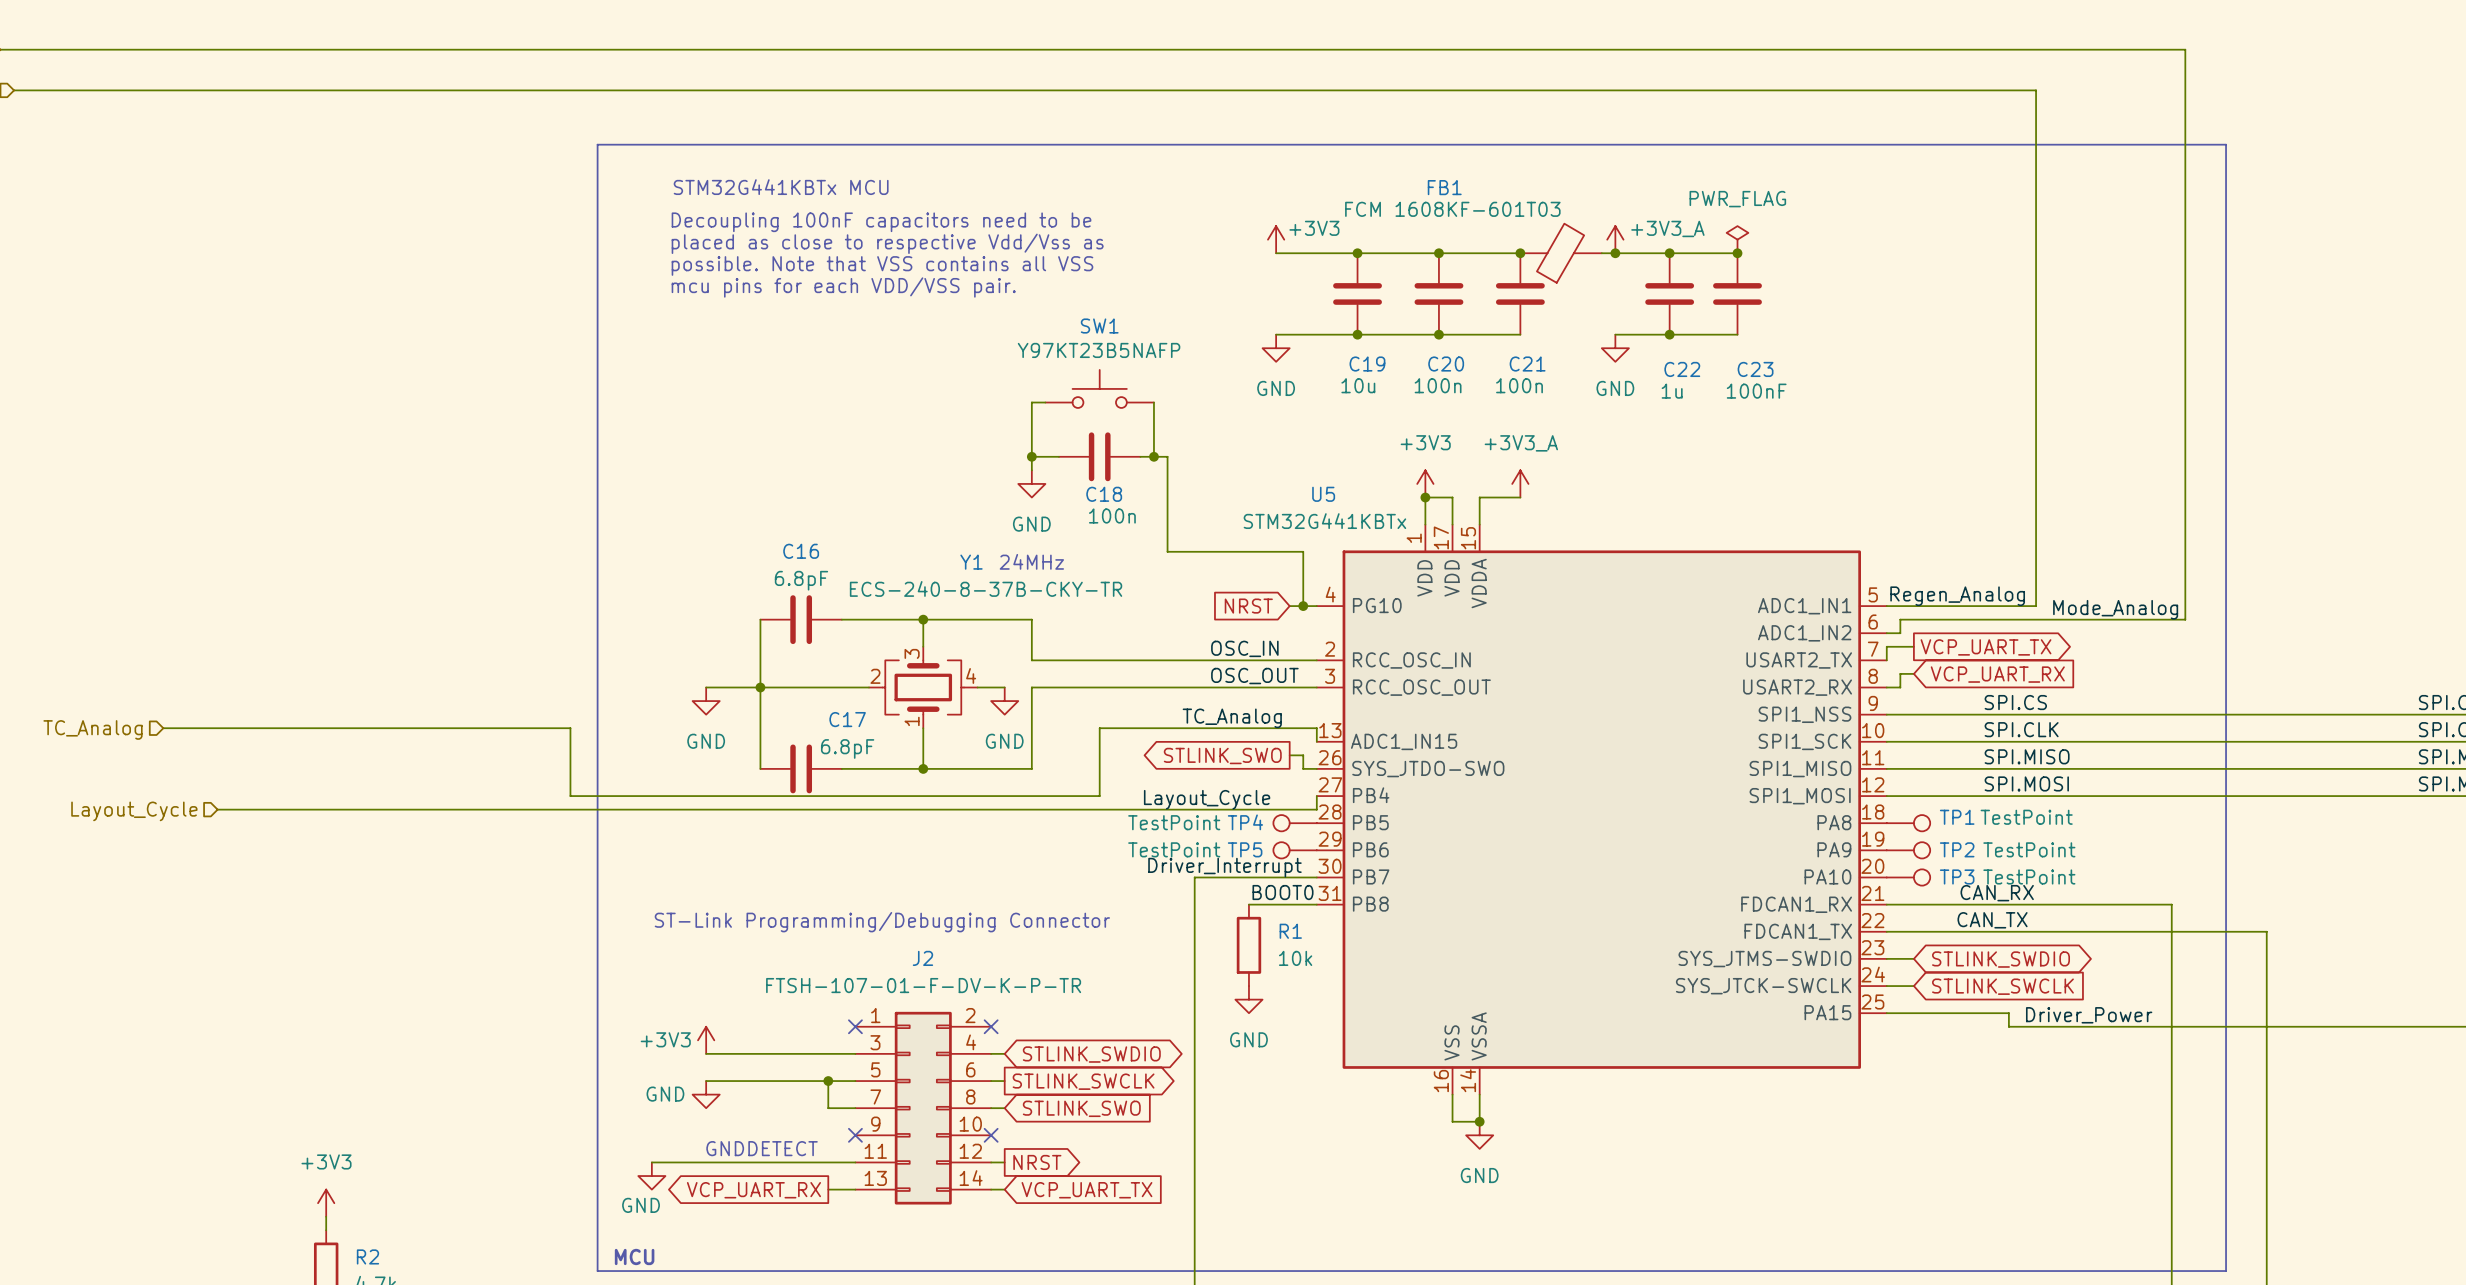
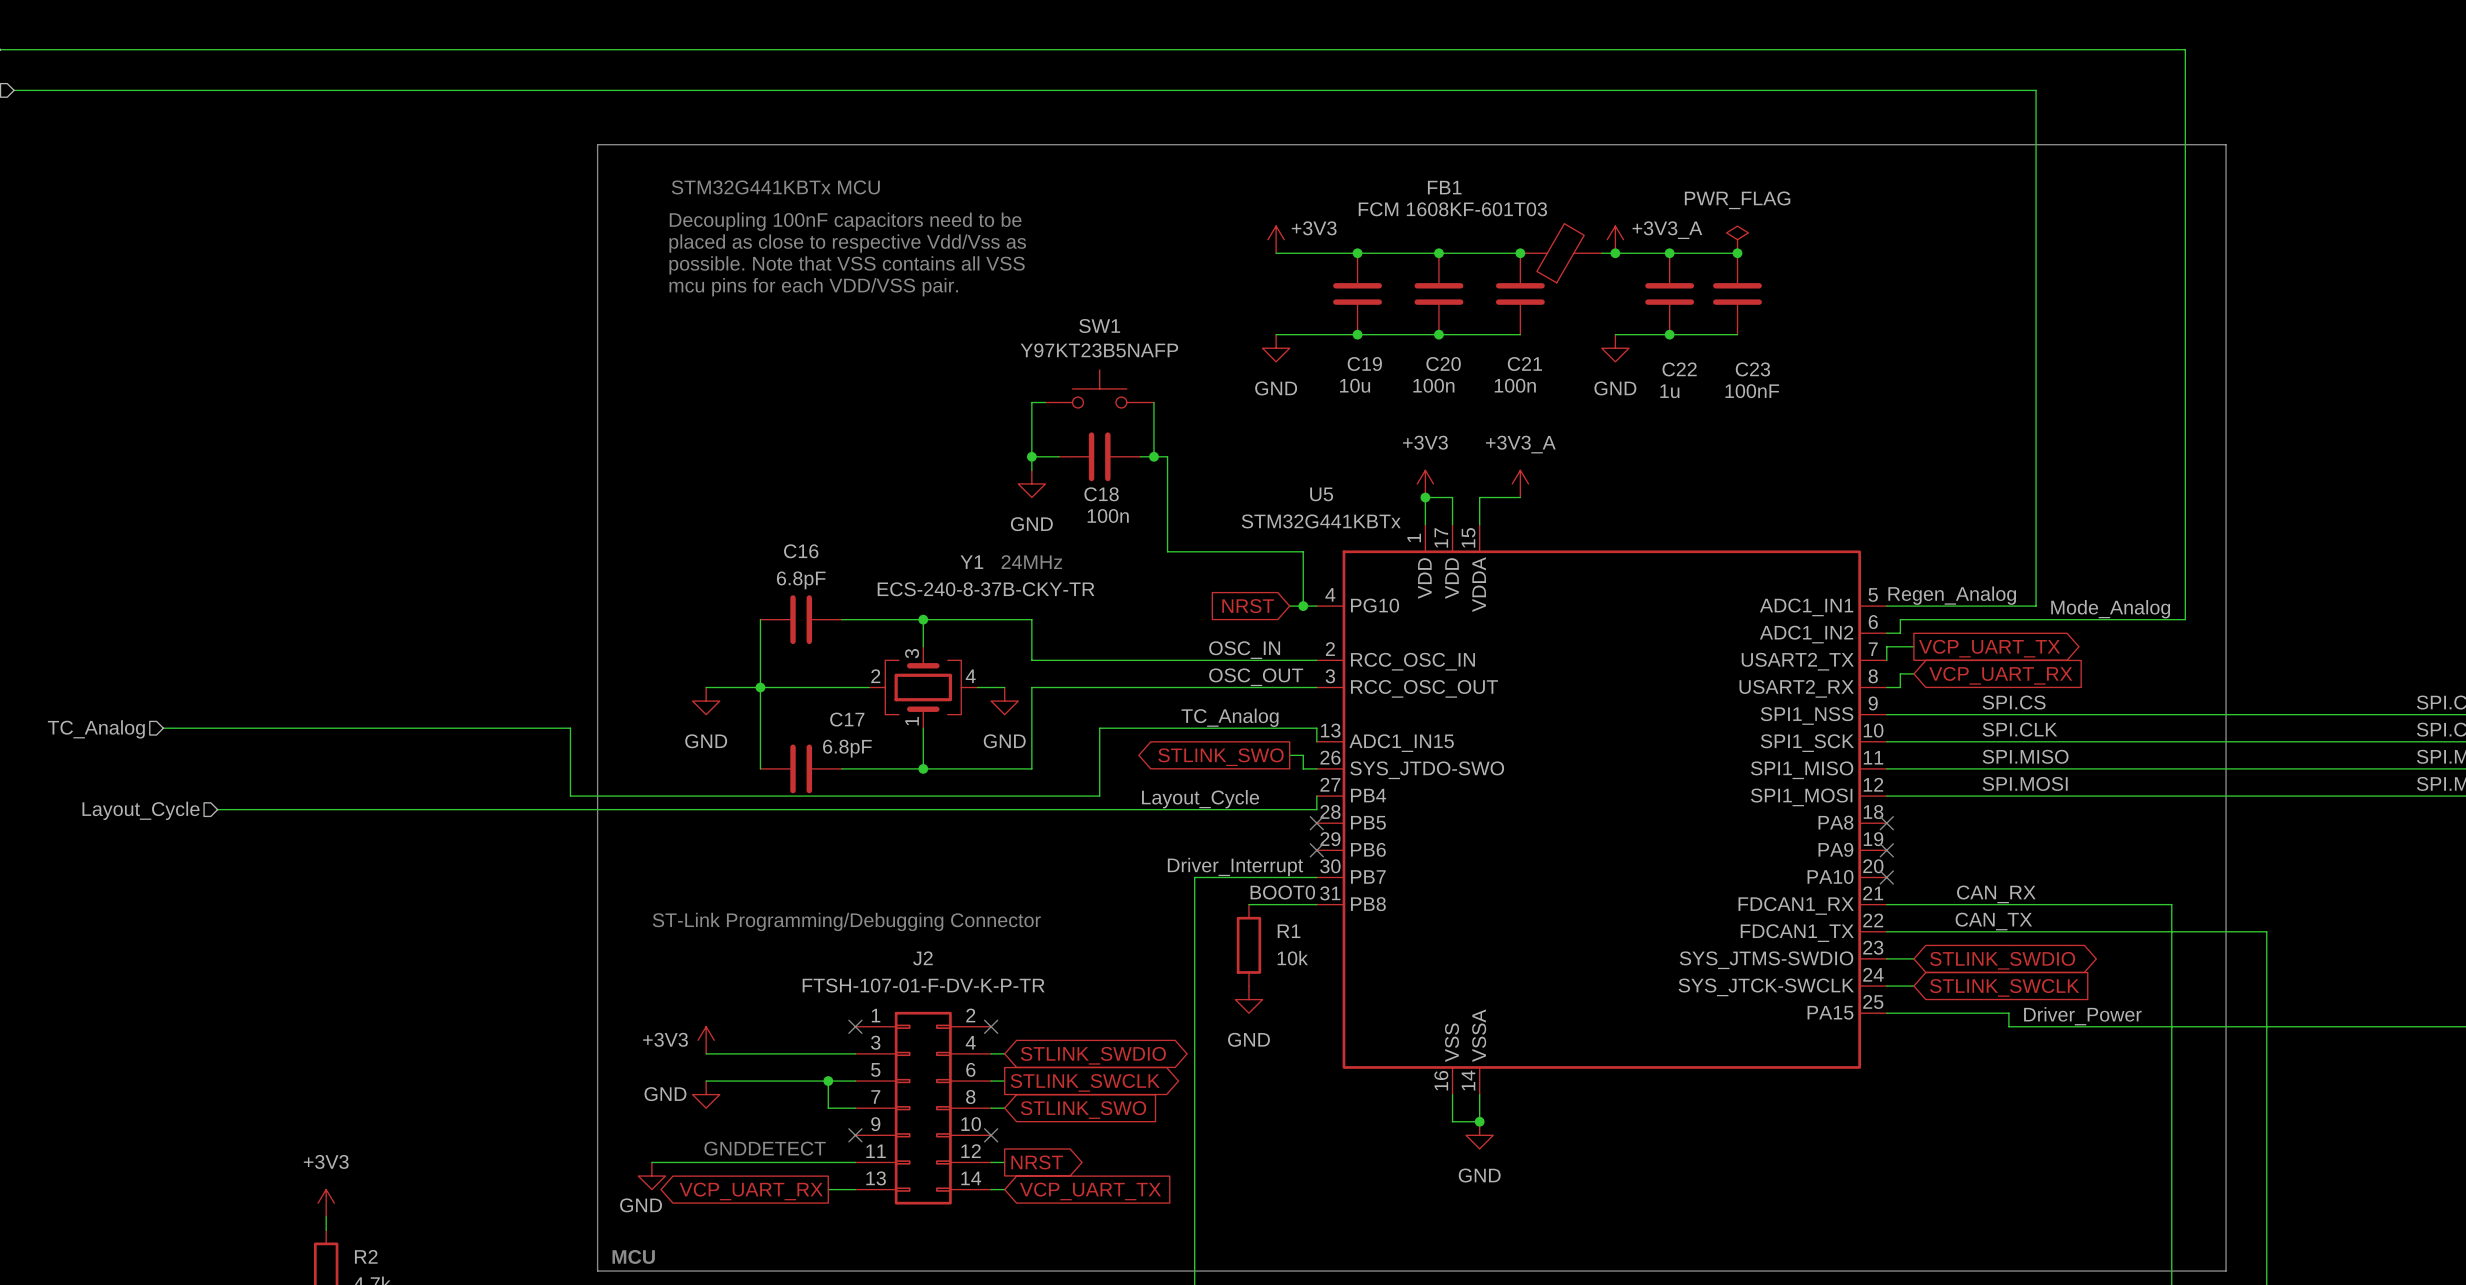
TP4: TestPoint (1295, 823) -> none
no-connect mark: none -> (1316, 823)
no-connect mark: none -> (1886, 823)
TP1: TestPoint (1908, 823) -> none
TP5: TestPoint (1295, 850) -> none
no-connect mark: none -> (1316, 850)
no-connect mark: none -> (1886, 850)
TP2: TestPoint (1908, 850) -> none
no-connect mark: none -> (1886, 877)
TP3: TestPoint (1908, 877) -> none

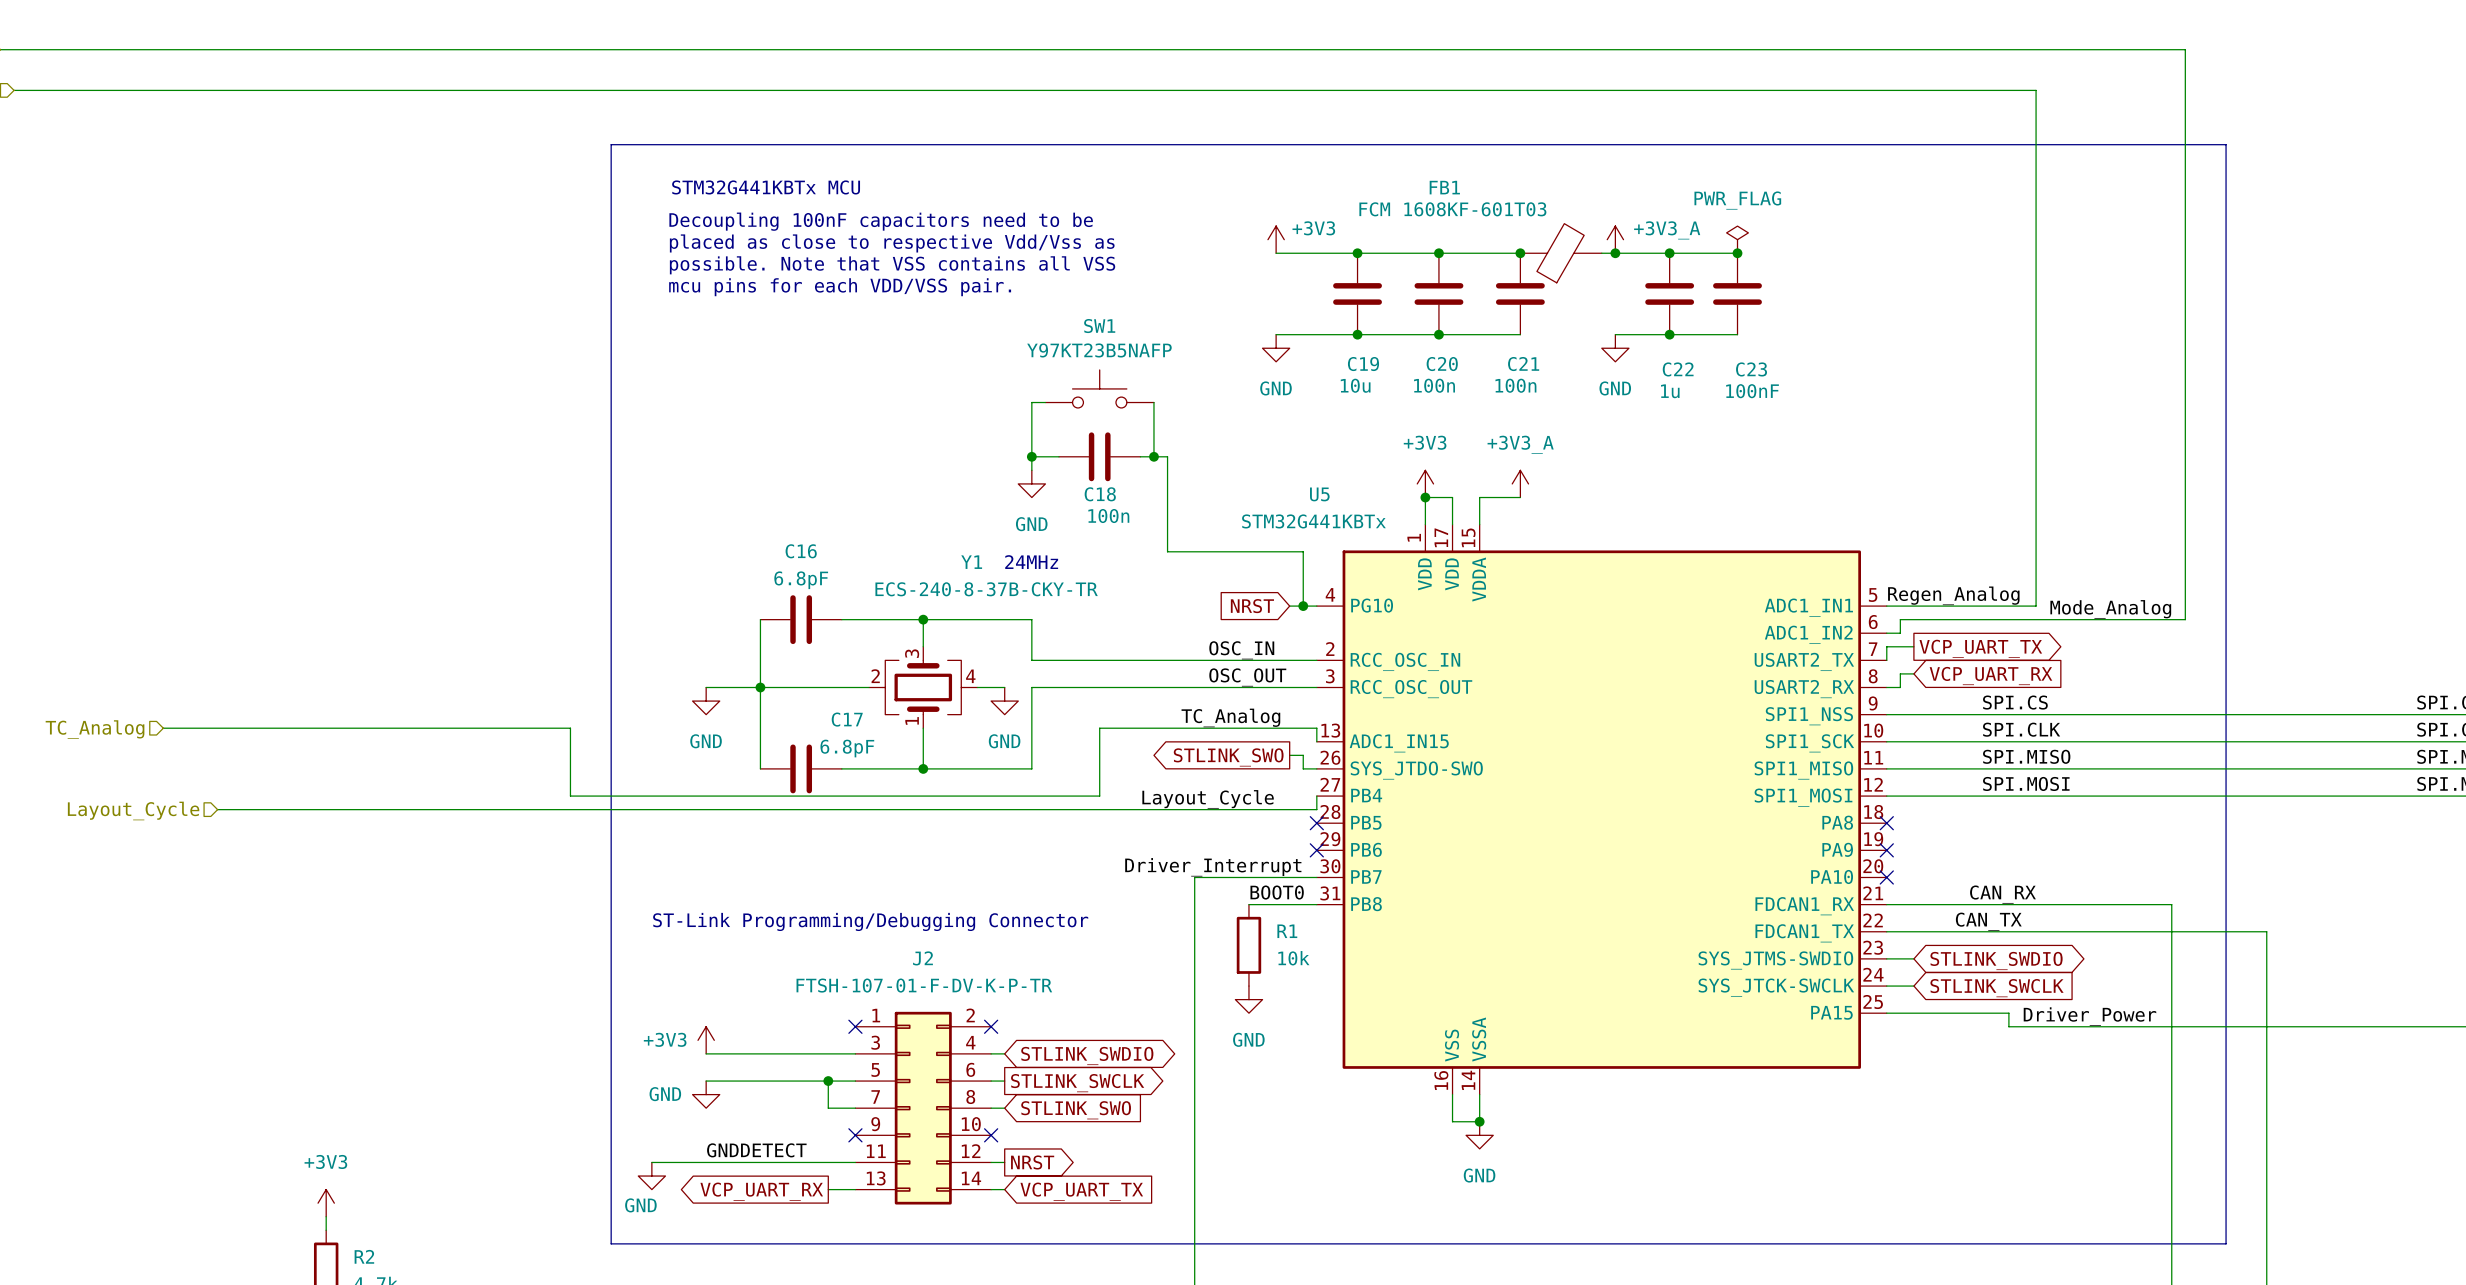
line: (611, 144) (597, 144) (597, 1271) (2226, 1271) (2226, 1243) -> (611, 144) (611, 1243) (2226, 1243)
text: GNDDETECT (765, 1148) -> none
label: none -> GNDDETECT (756, 1150)
text: MCU (633, 1256) -> none

